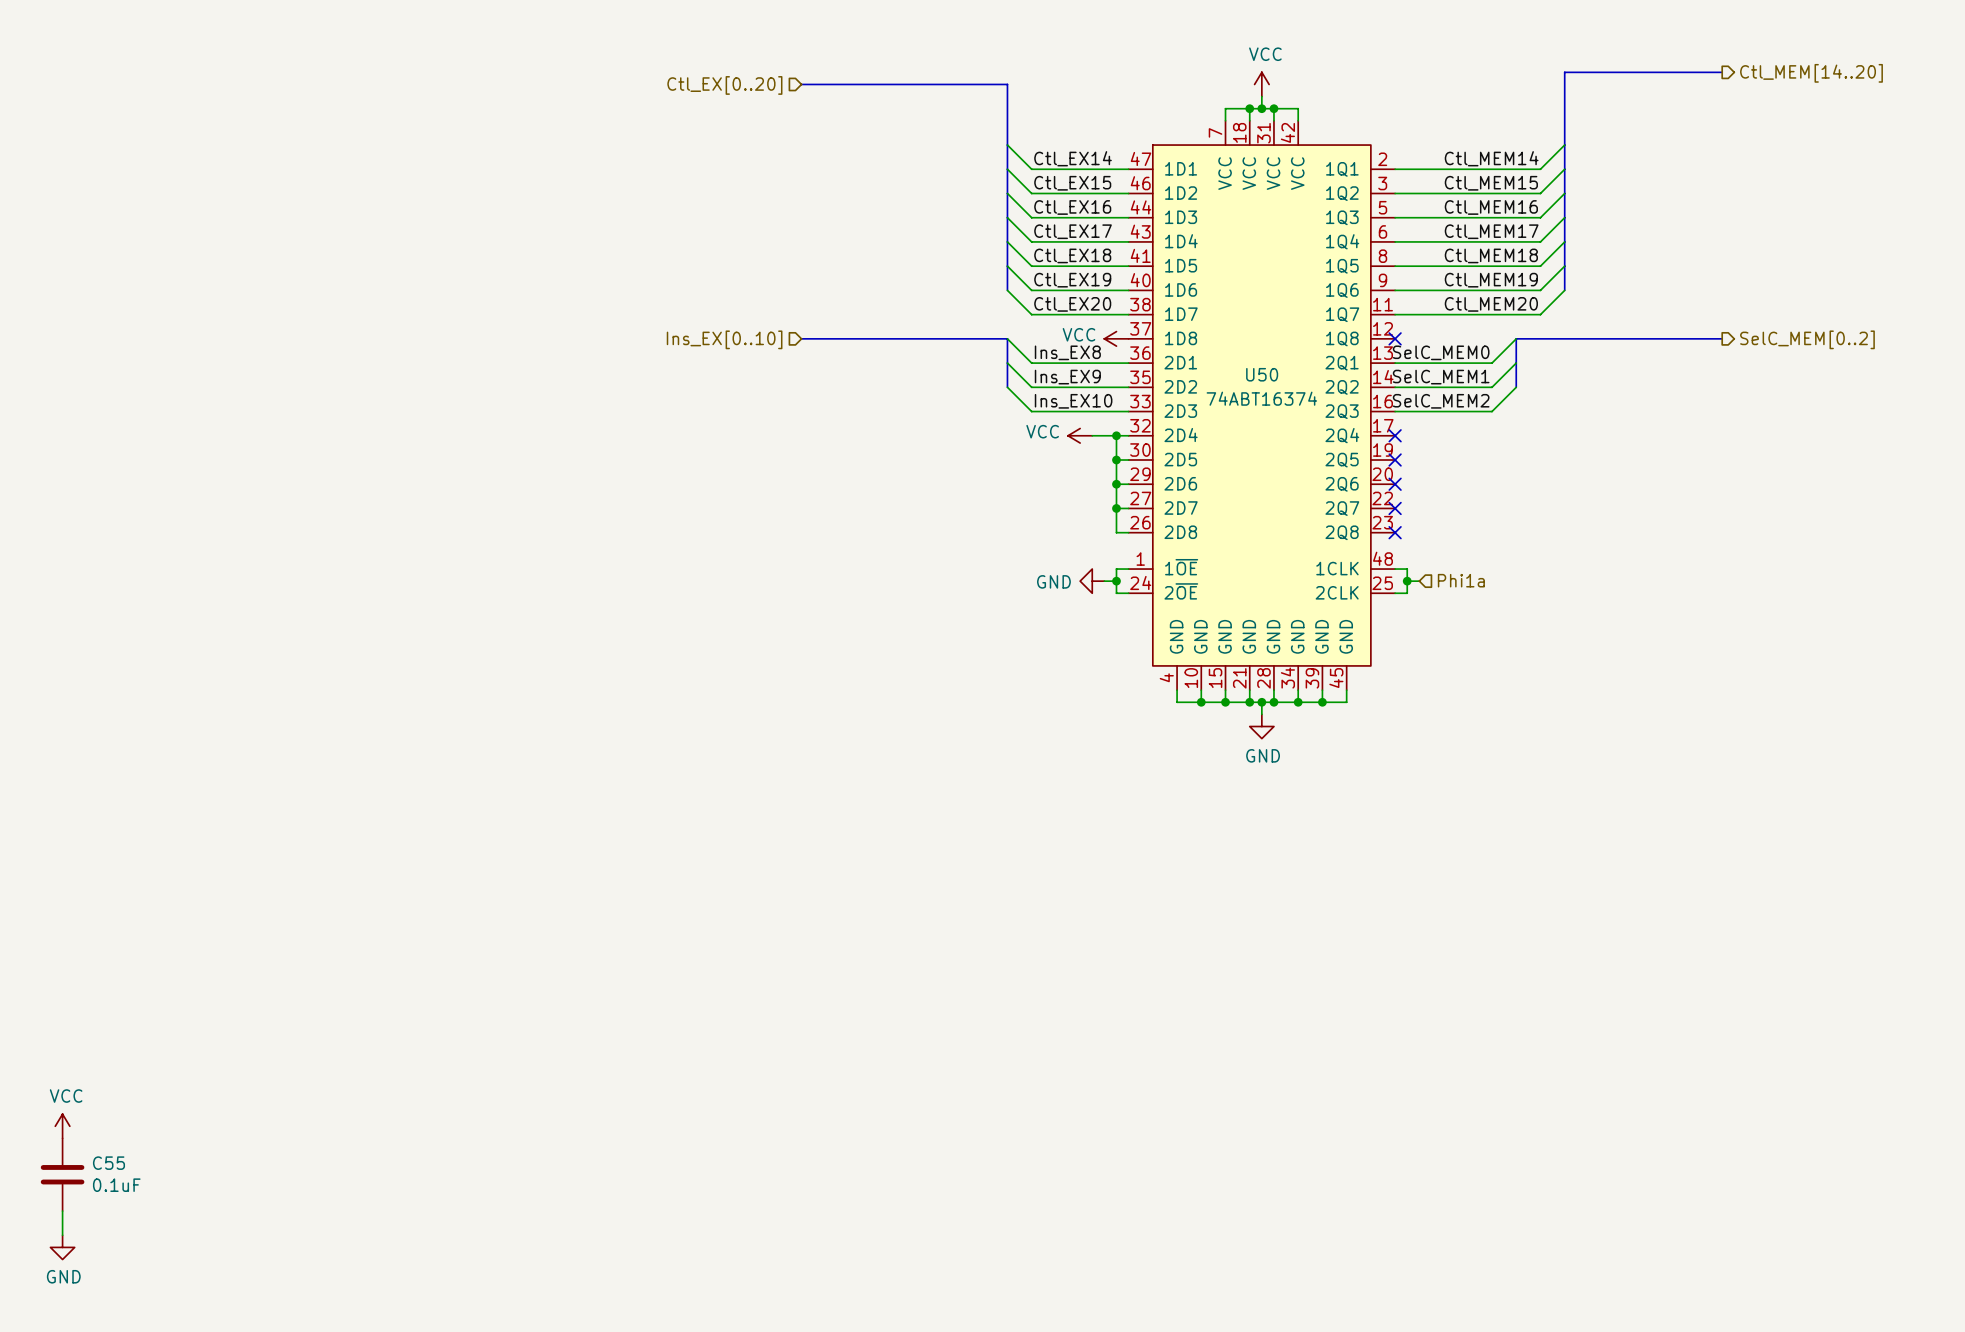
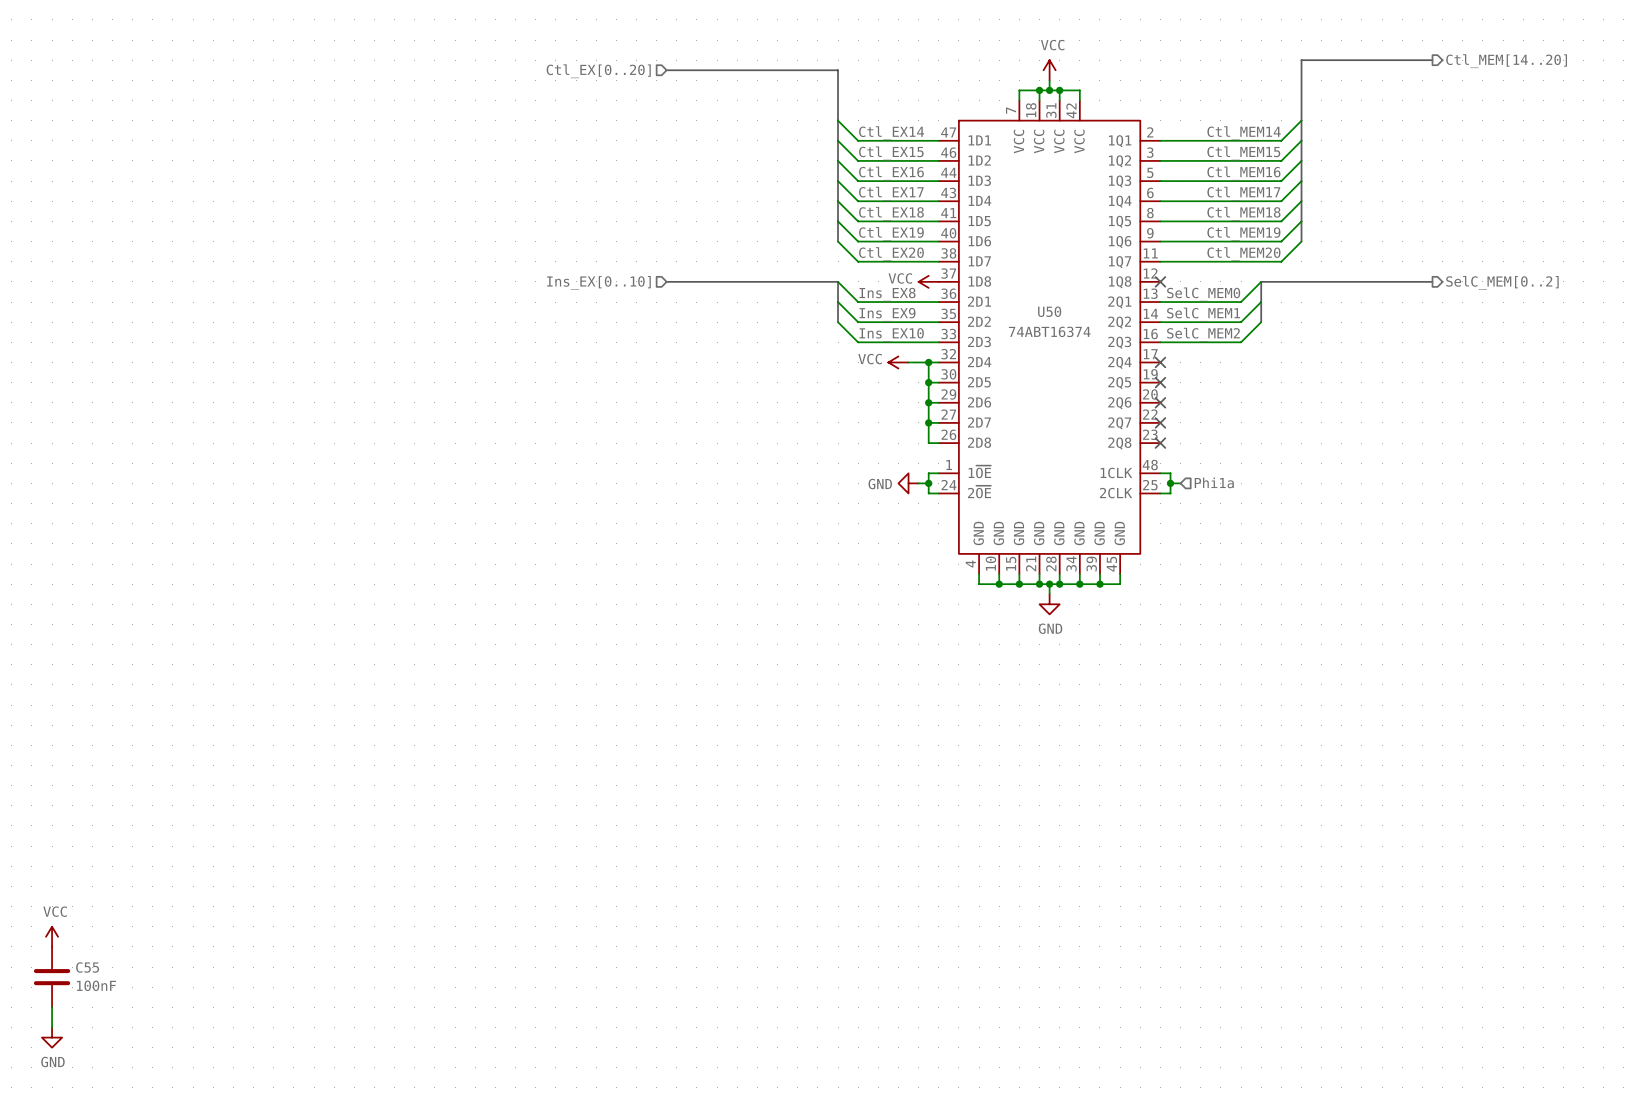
C55 value: 0.1uF (116, 1185) -> 100nF (96, 985)

